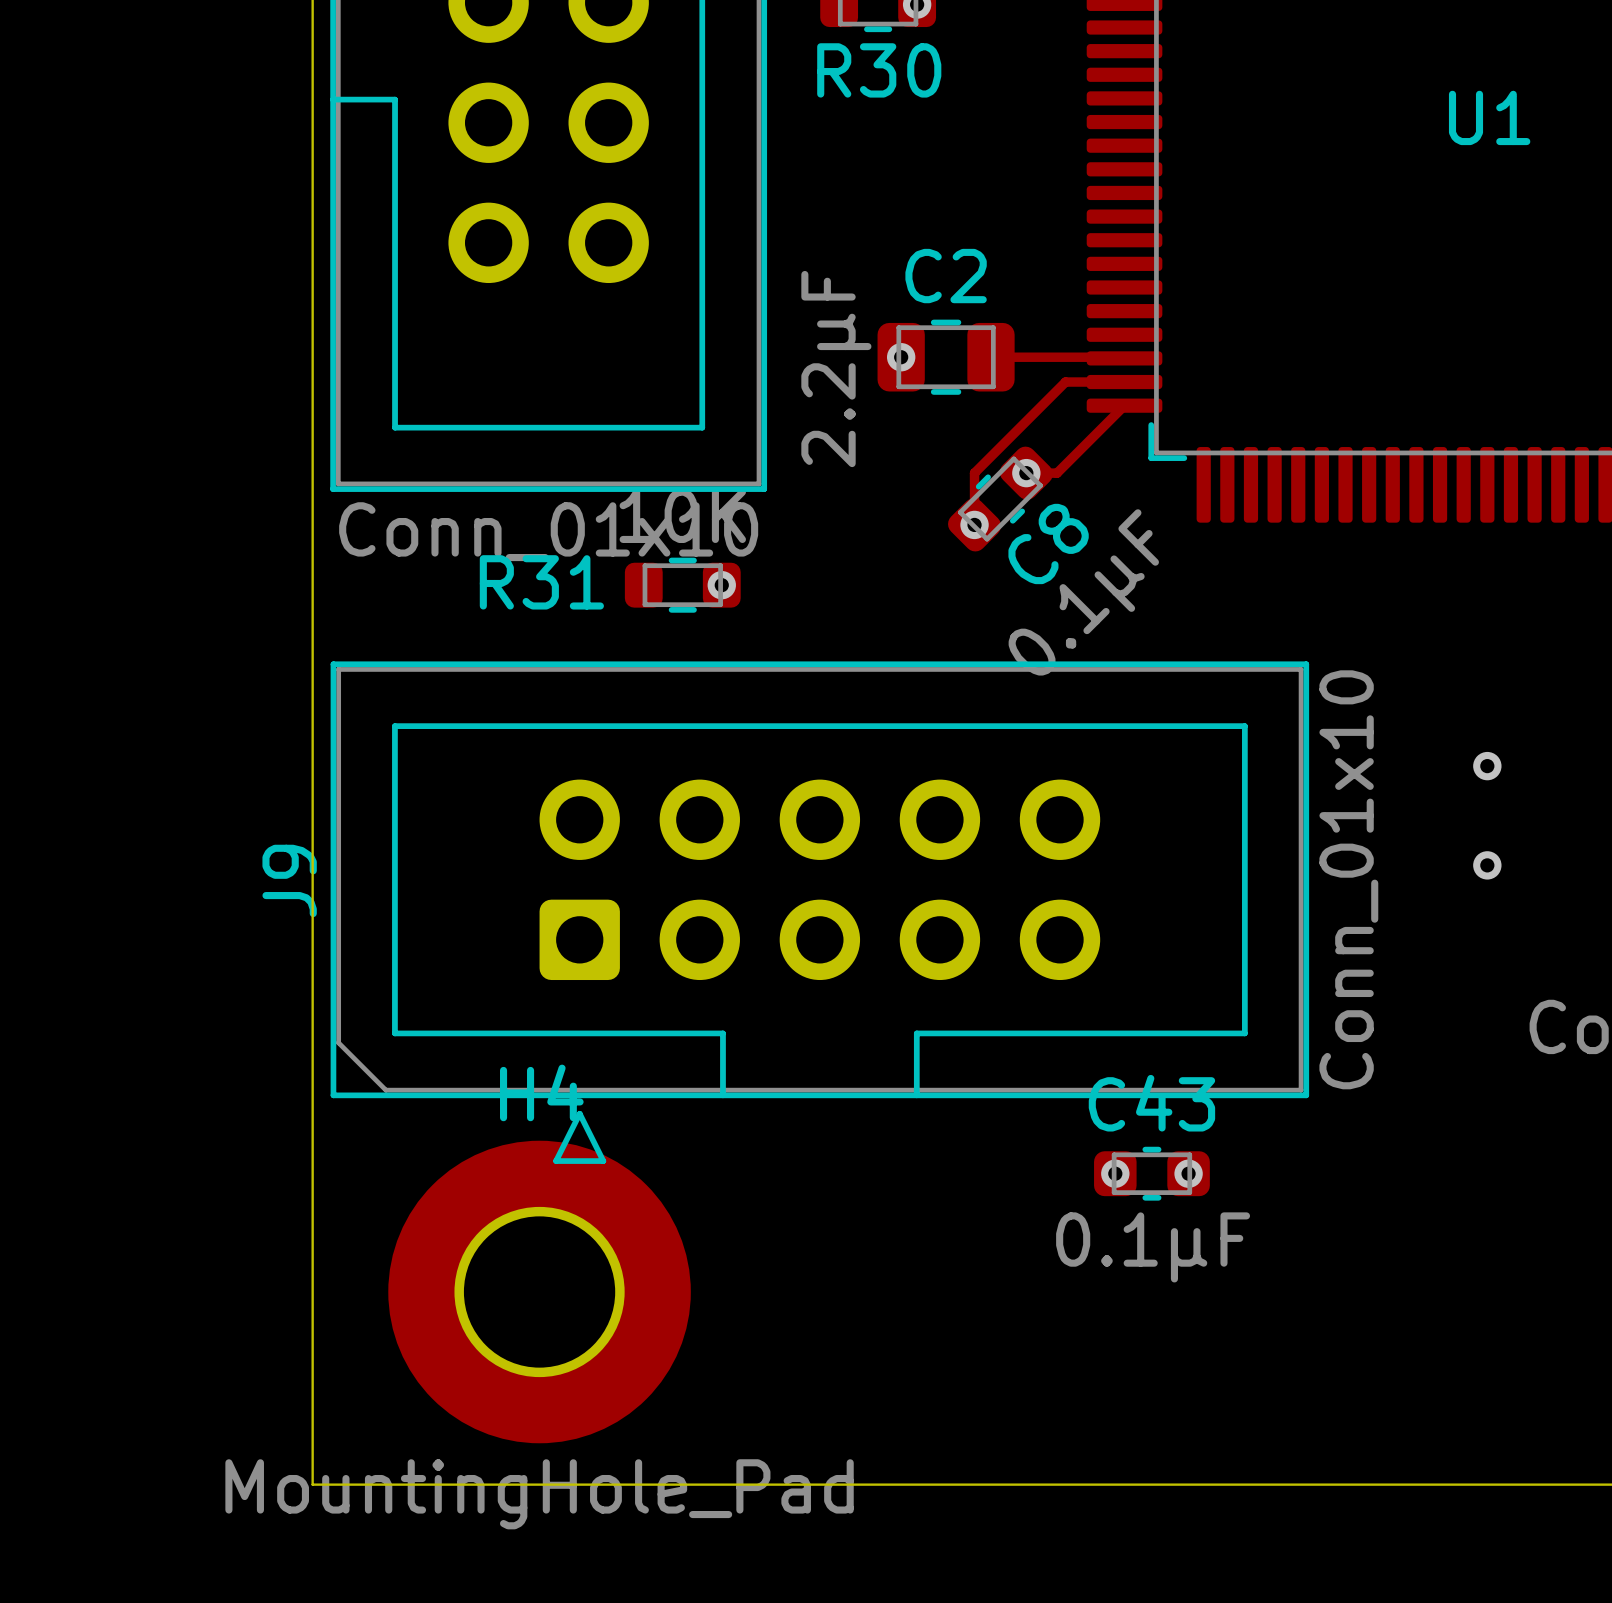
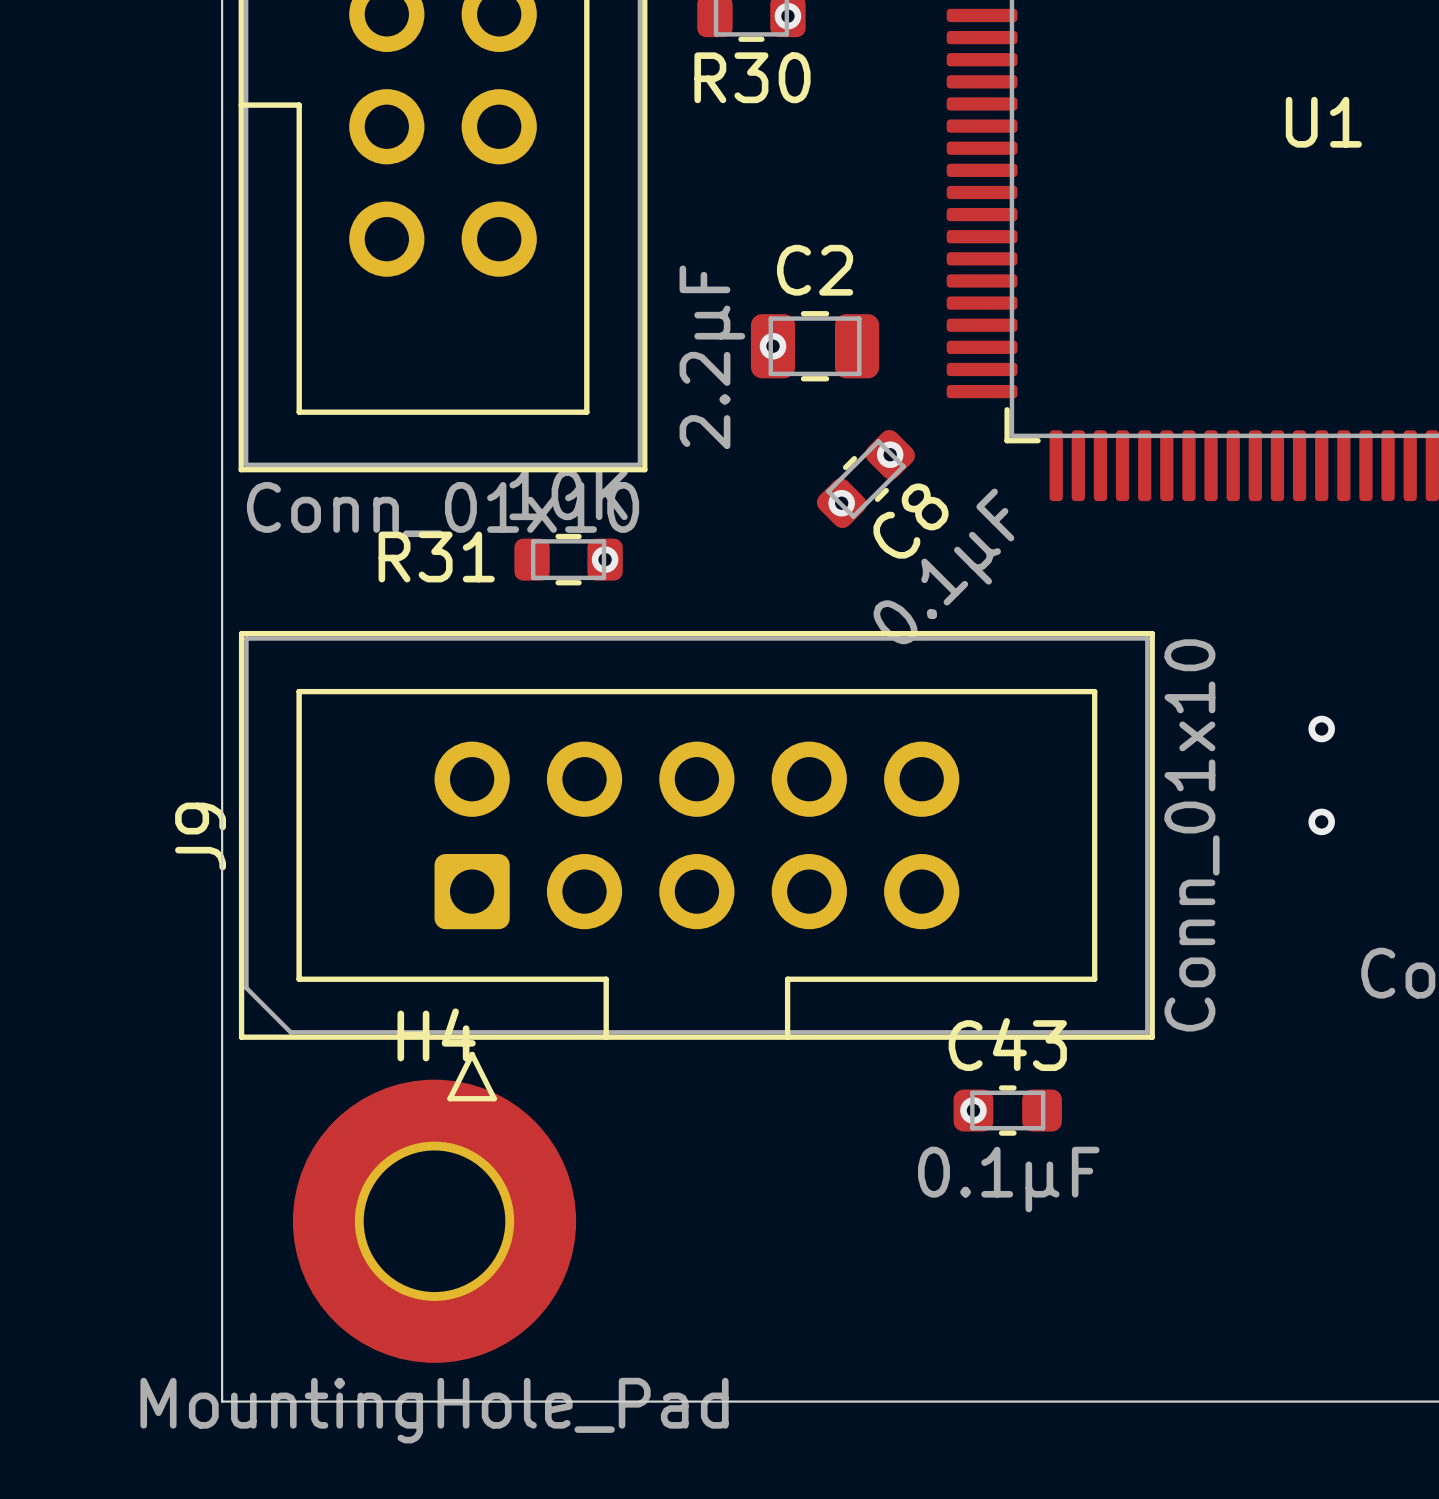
track: (990, 357) (1124, 358) -> none
track: (1124, 382) (1065, 382) (974, 473) (974, 524) -> none
track: (1124, 405) (1057, 473) (1026, 473) -> none
via: (1188, 1173) -> none

